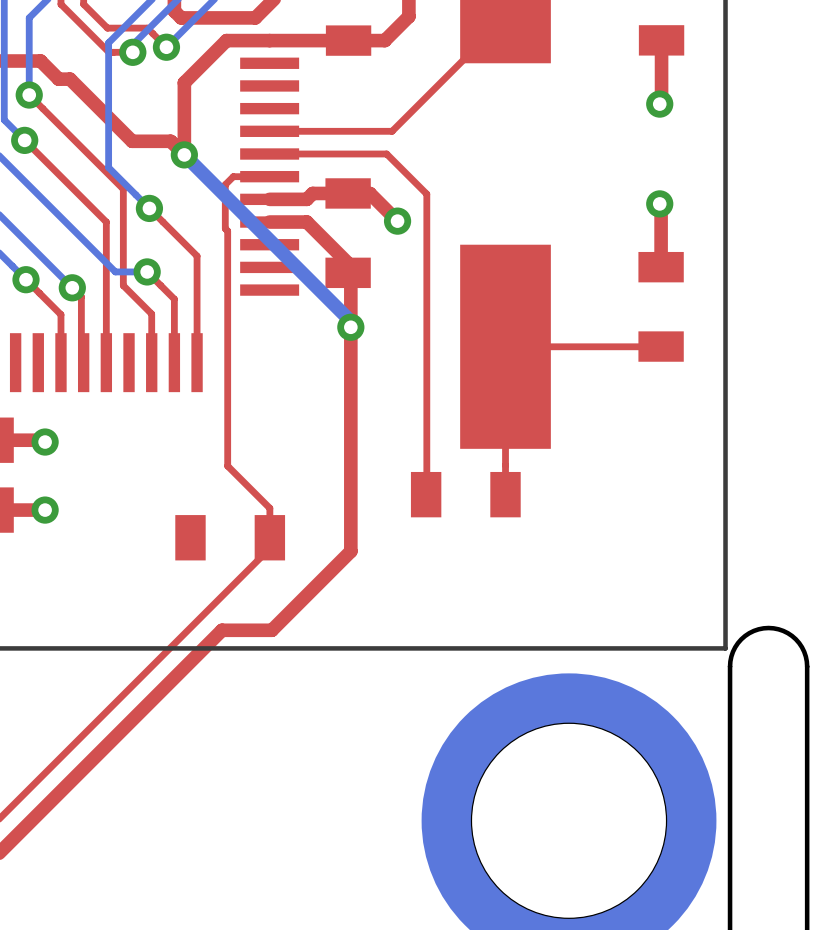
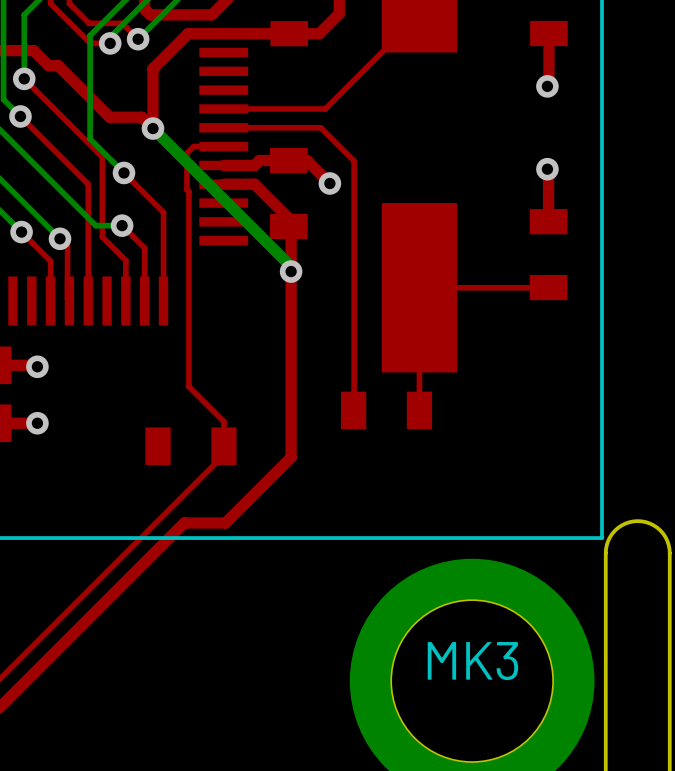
MK3 name: none -> MK3 (472, 661)

